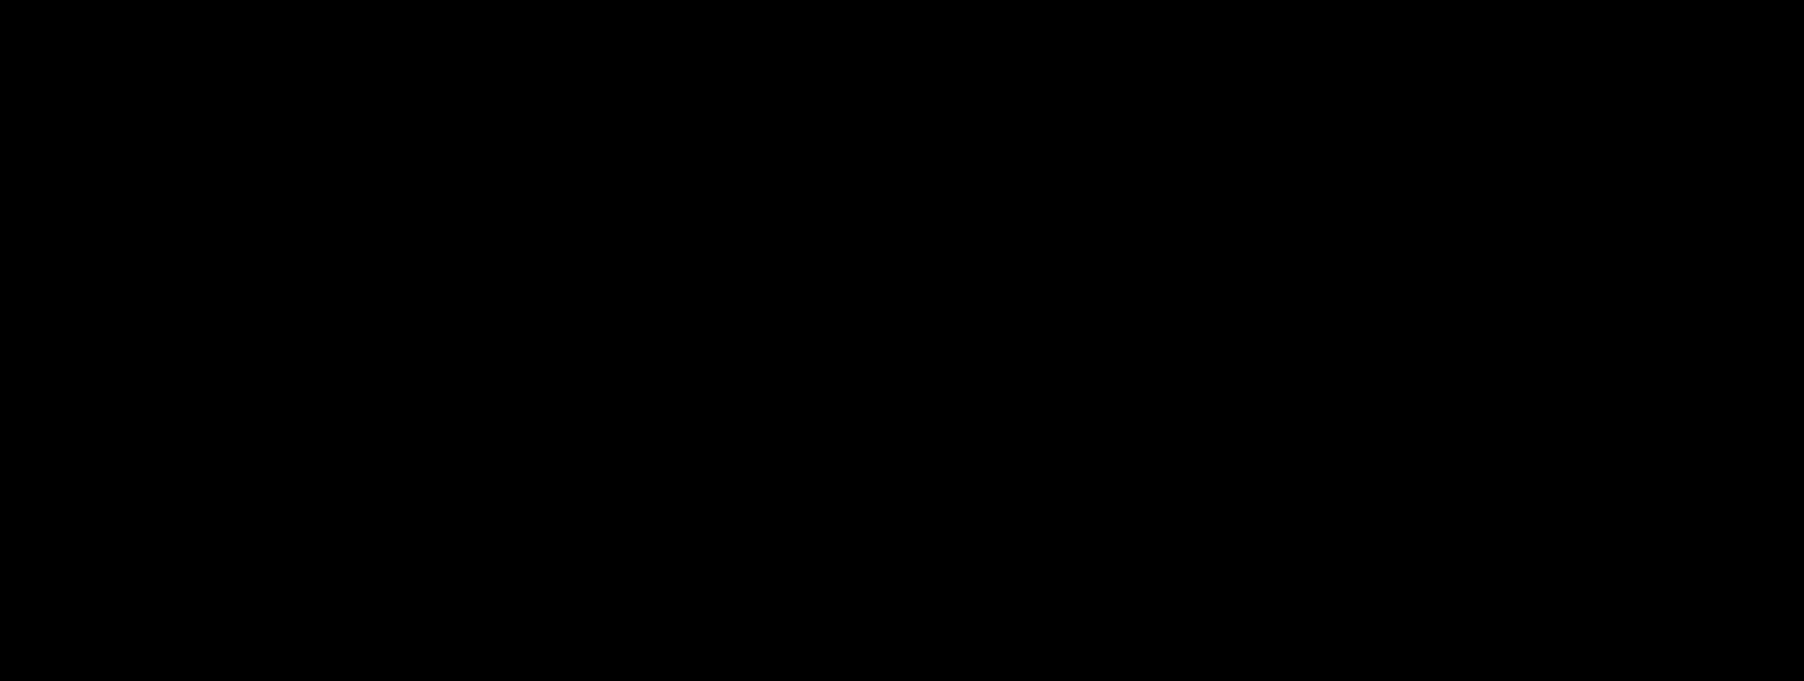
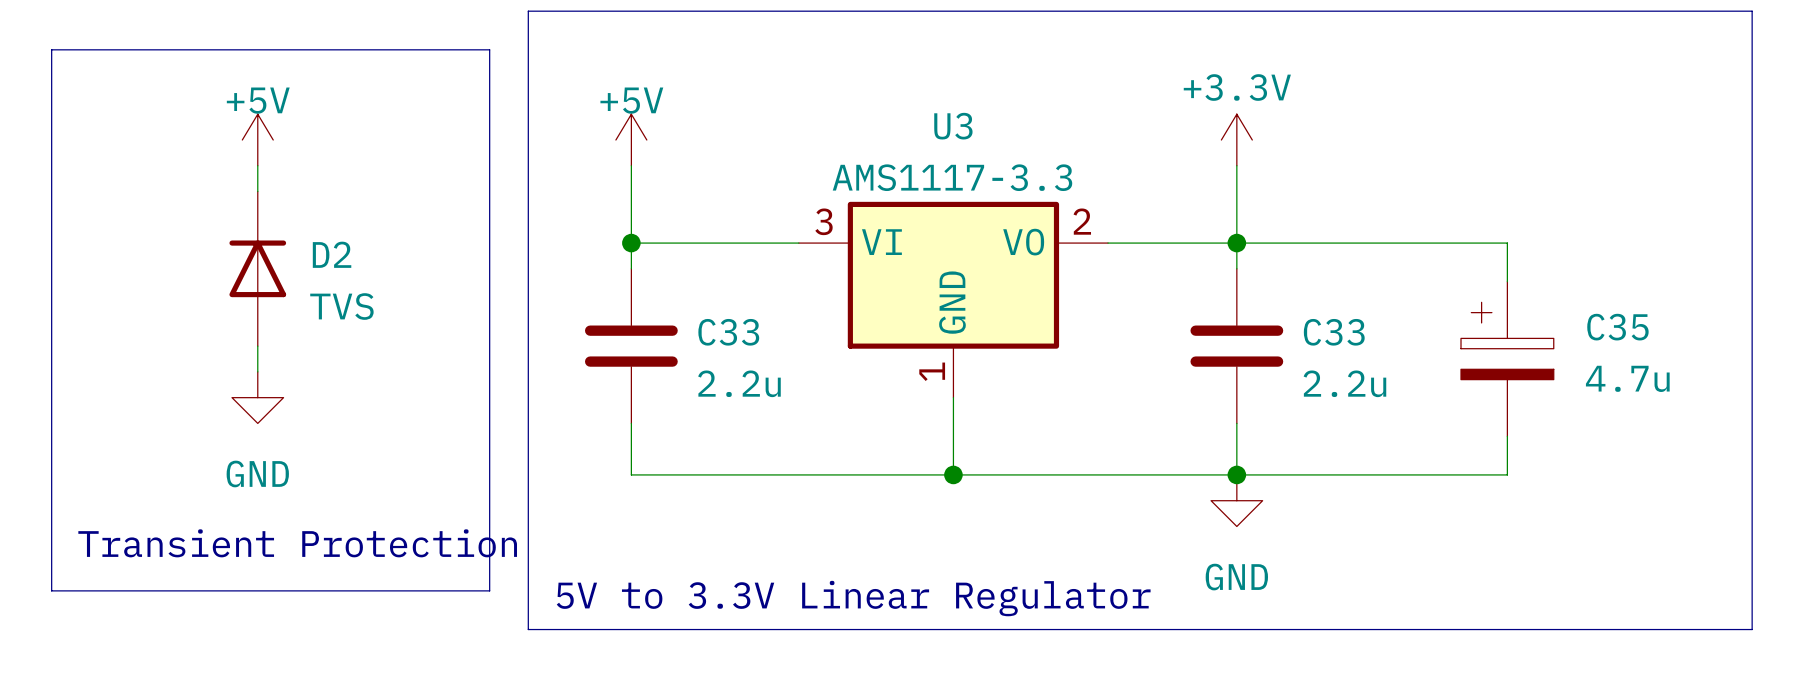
line: none -> (528, 11) (1752, 11) (1752, 629) (528, 629) (528, 11)
line: none -> (51, 49) (489, 49) (489, 590) (51, 590) (51, 49)
power symbol: none -> +5V (257, 140)
power symbol: none -> +5V (631, 140)
power symbol: none -> +3.3V (1236, 140)
wire: none -> (257, 165) (257, 191)
wire: none -> (631, 165) (631, 268)
wire: none -> (1236, 165) (1236, 268)
wire: none -> (631, 243) (798, 243)
junction: none -> (631, 243)
wire: none -> (1108, 243) (1507, 243) (1507, 281)
junction: none -> (1236, 243)
D2: none -> TVS (257, 268)
U3: none -> AMS1117-3.3 (953, 299)
wire: none -> (257, 346) (257, 371)
C33: none -> 2.2u (631, 346)
C33: none -> 2.2u (1236, 346)
C35: none -> 4.7u (1507, 359)
power symbol: none -> GND (257, 397)
wire: none -> (953, 397) (953, 474)
wire: none -> (631, 423) (631, 474) (1507, 474) (1507, 436)
wire: none -> (1236, 423) (1236, 474)
junction: none -> (953, 474)
junction: none -> (1236, 474)
power symbol: none -> GND (1236, 500)
text: none -> Transient Protection (297, 543)
text: none -> 5V to 3.3V Linear Regulator (853, 598)

